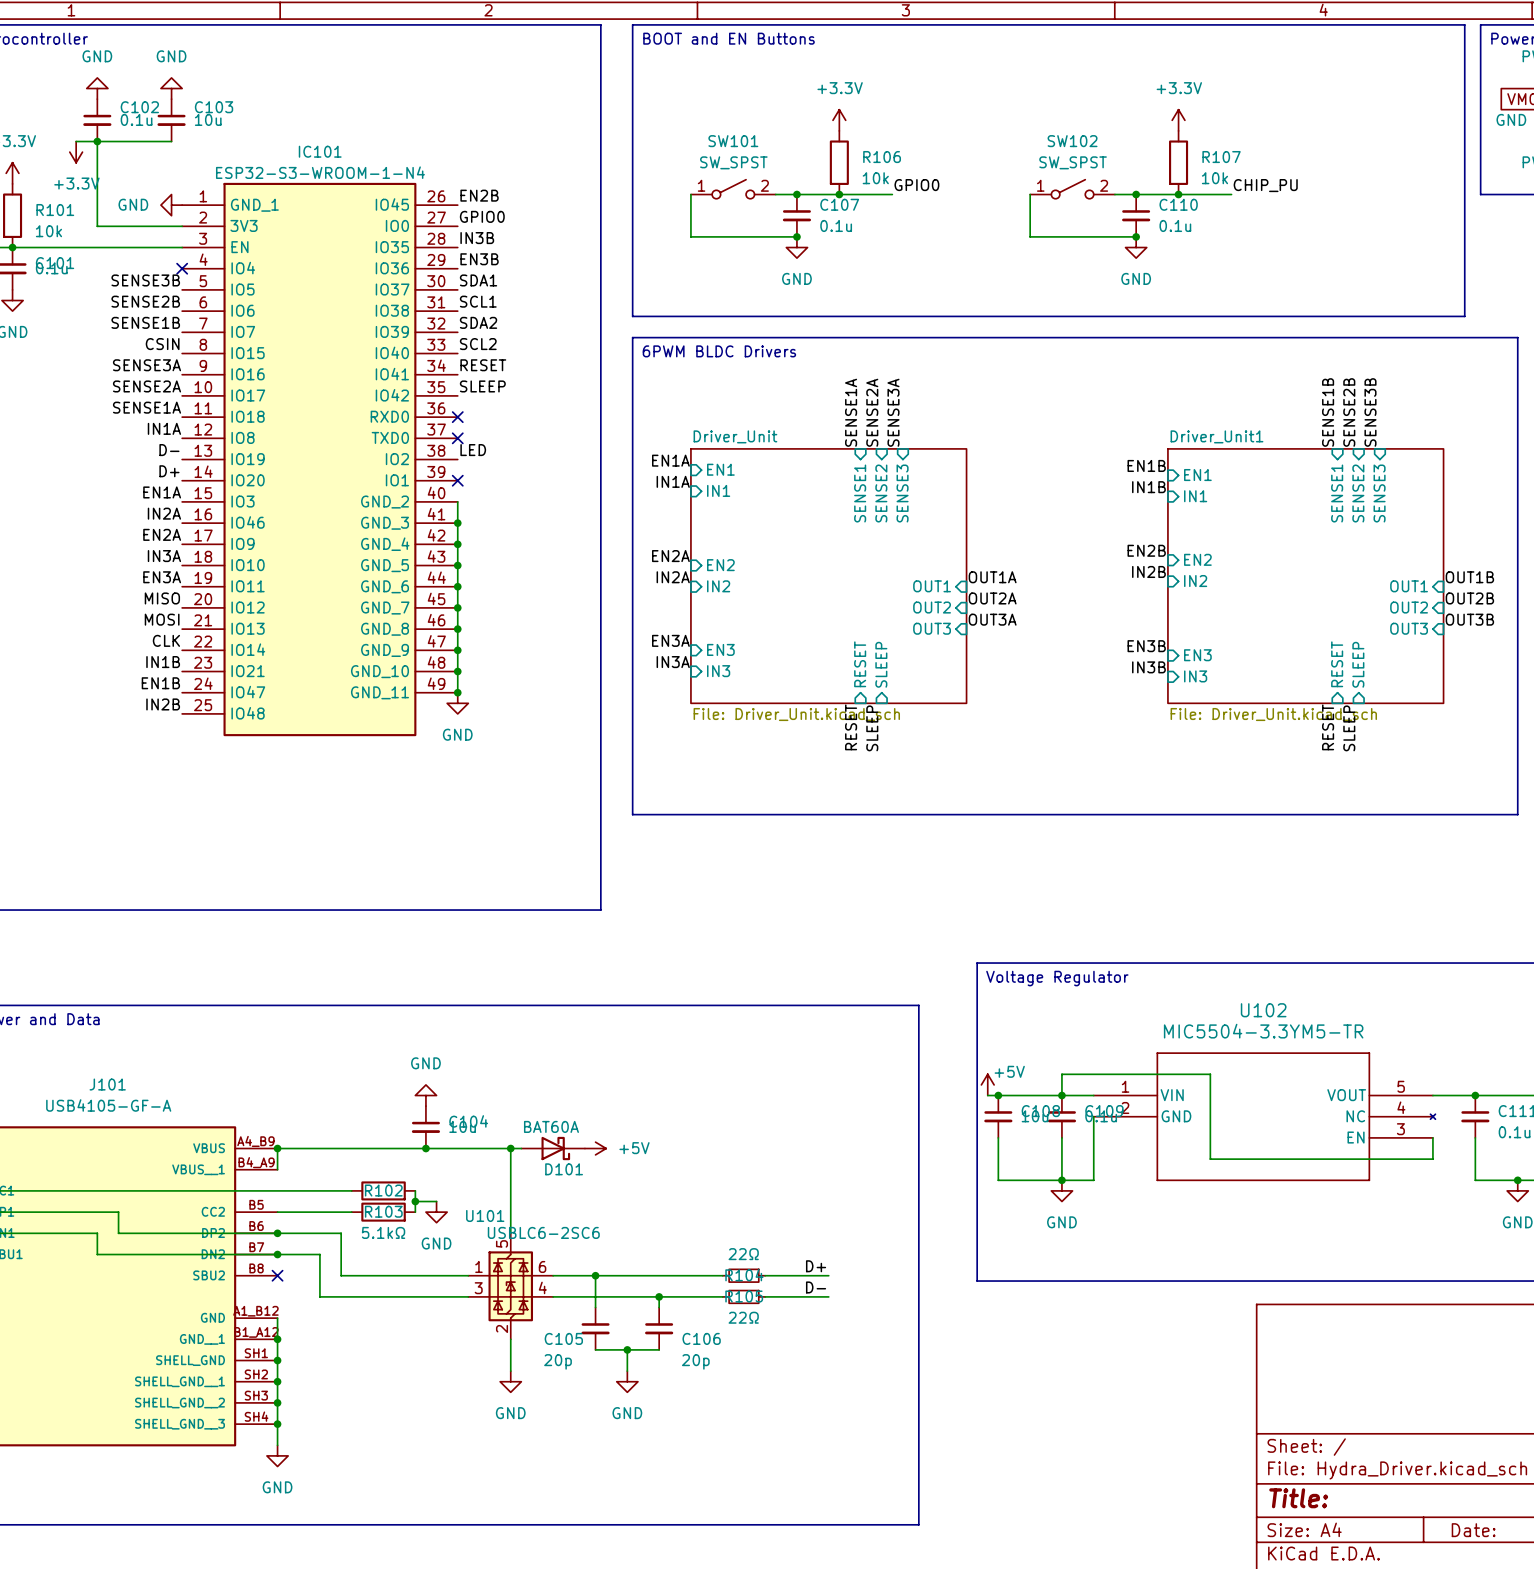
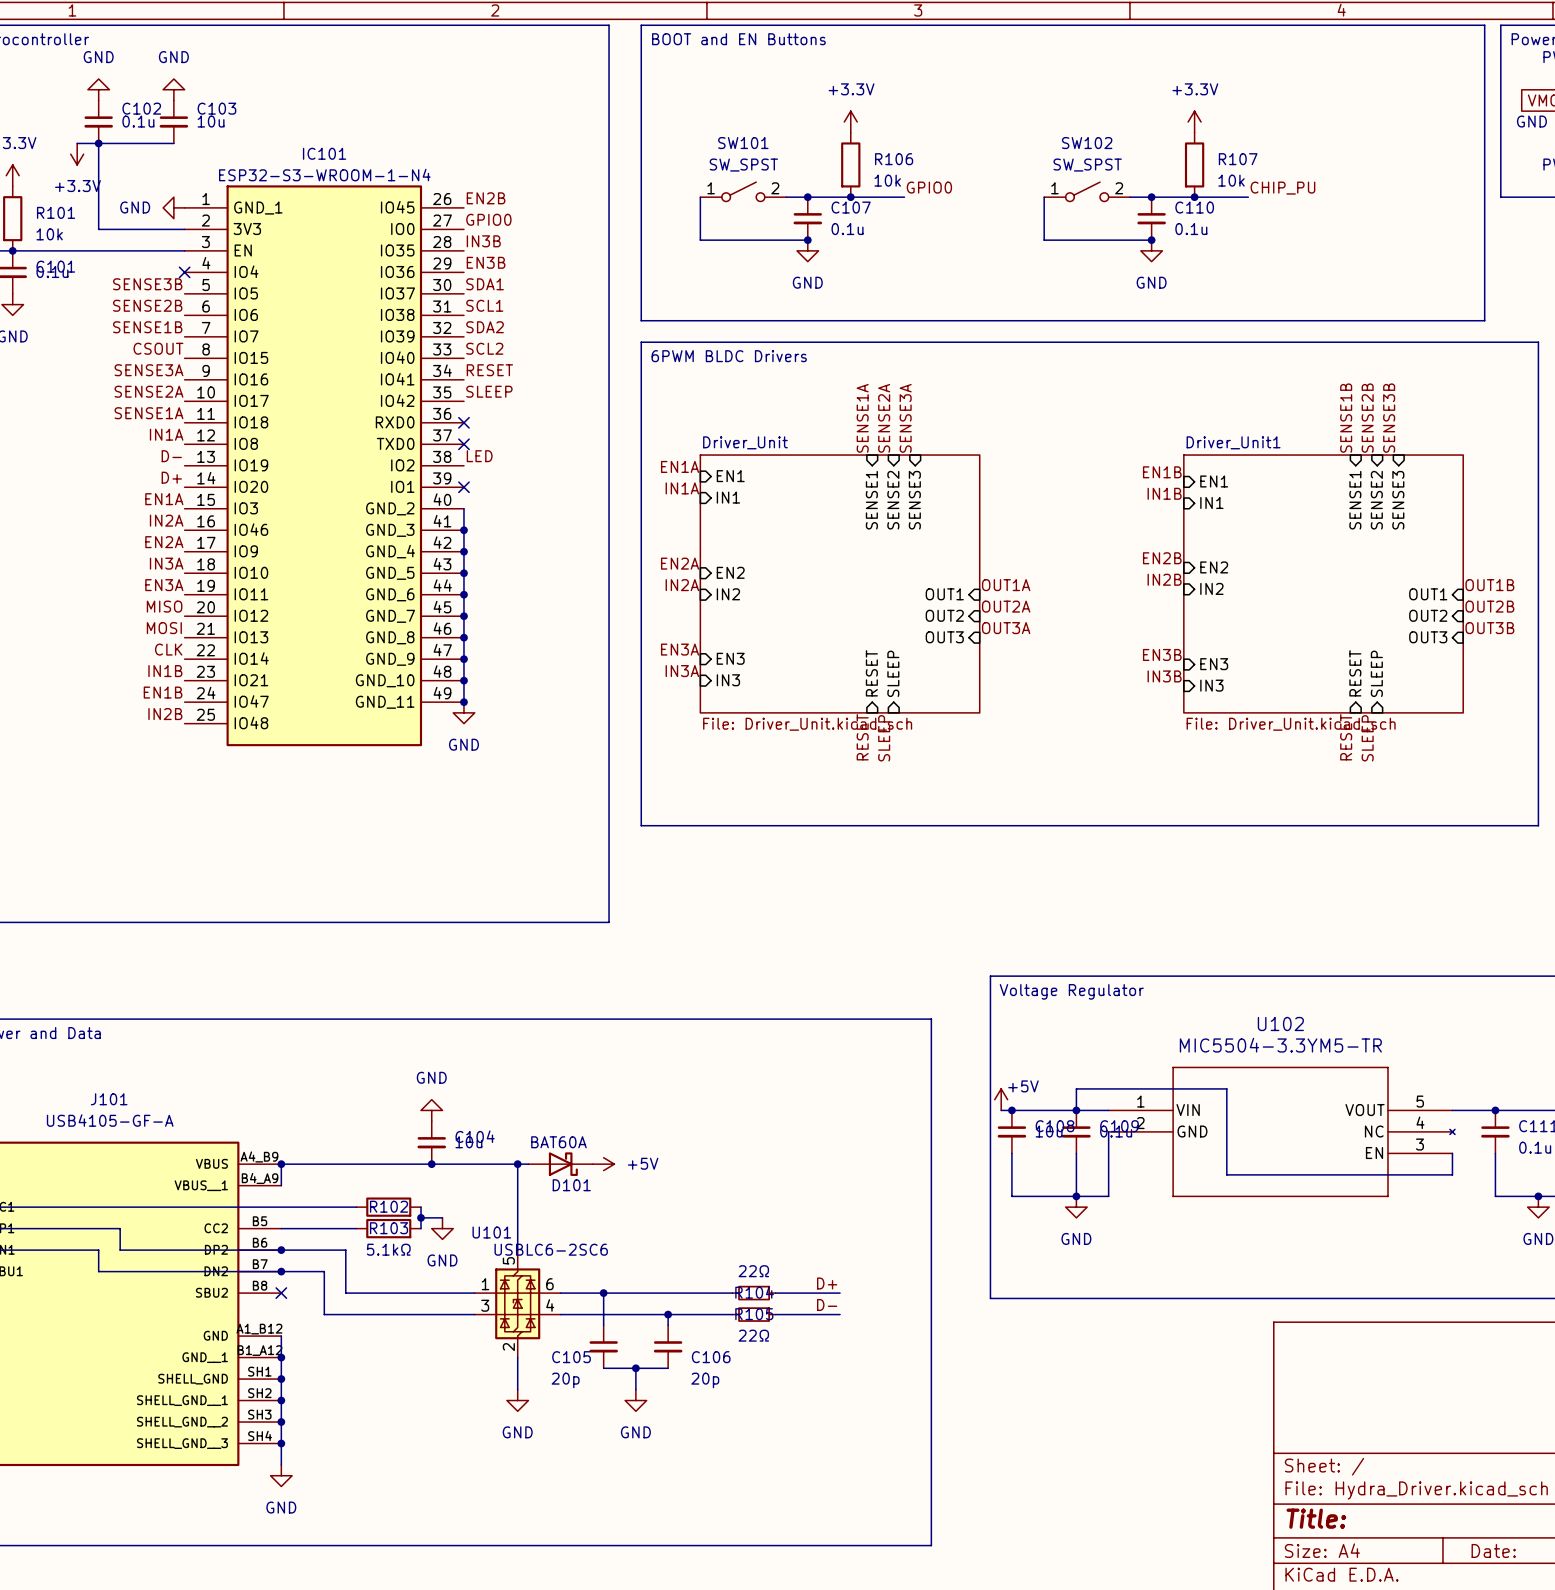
label: CSIN (162, 344) -> CSOUT (158, 348)

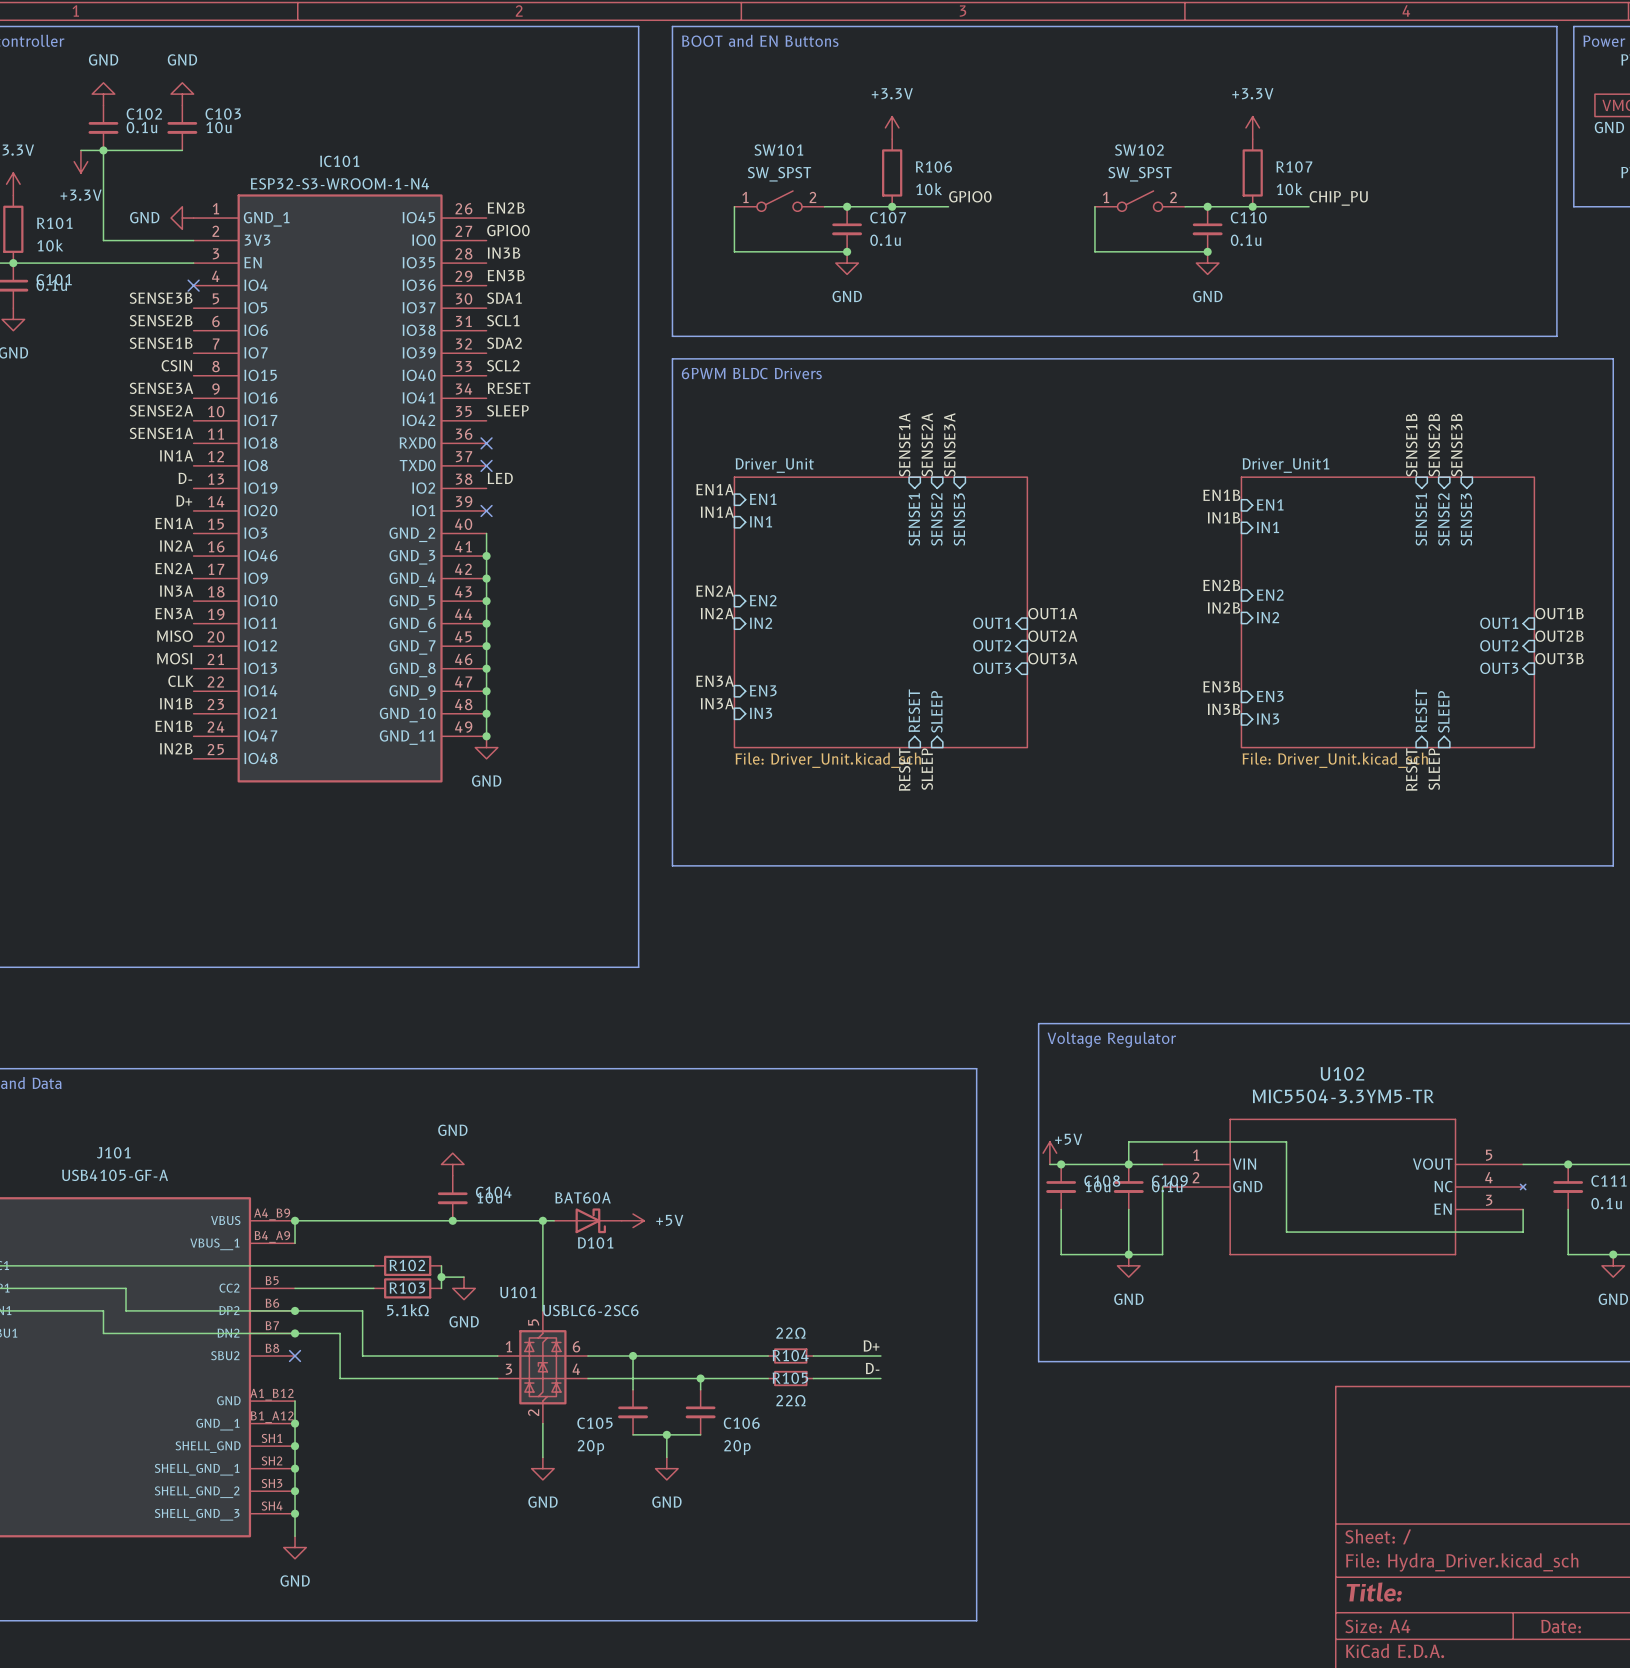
label: CSOUT (158, 348) -> CSIN (176, 365)

